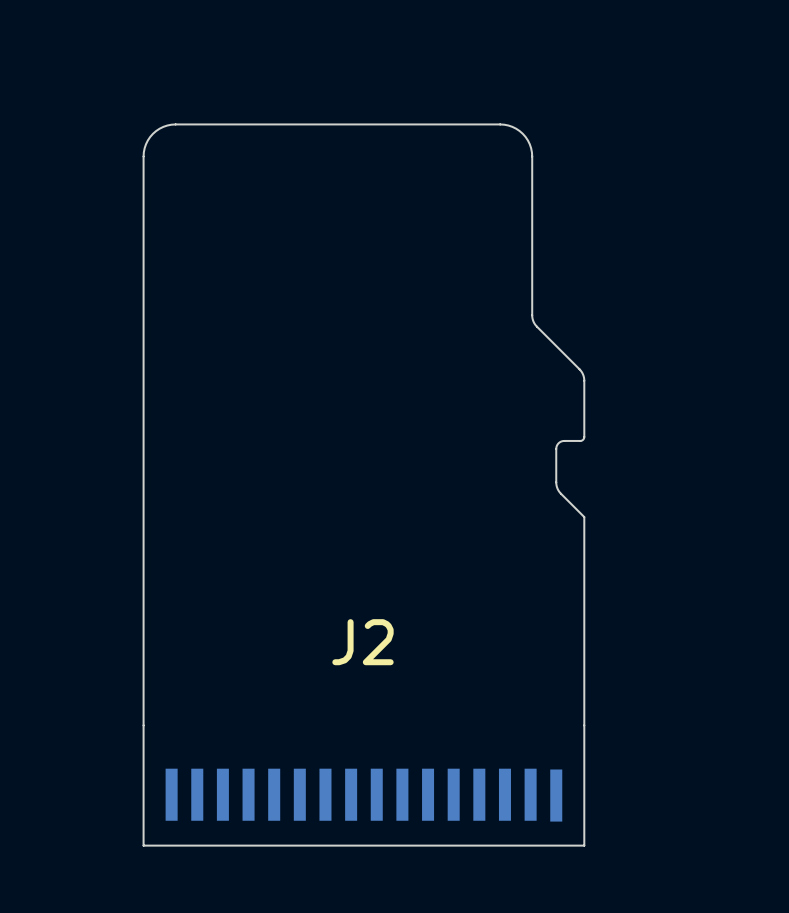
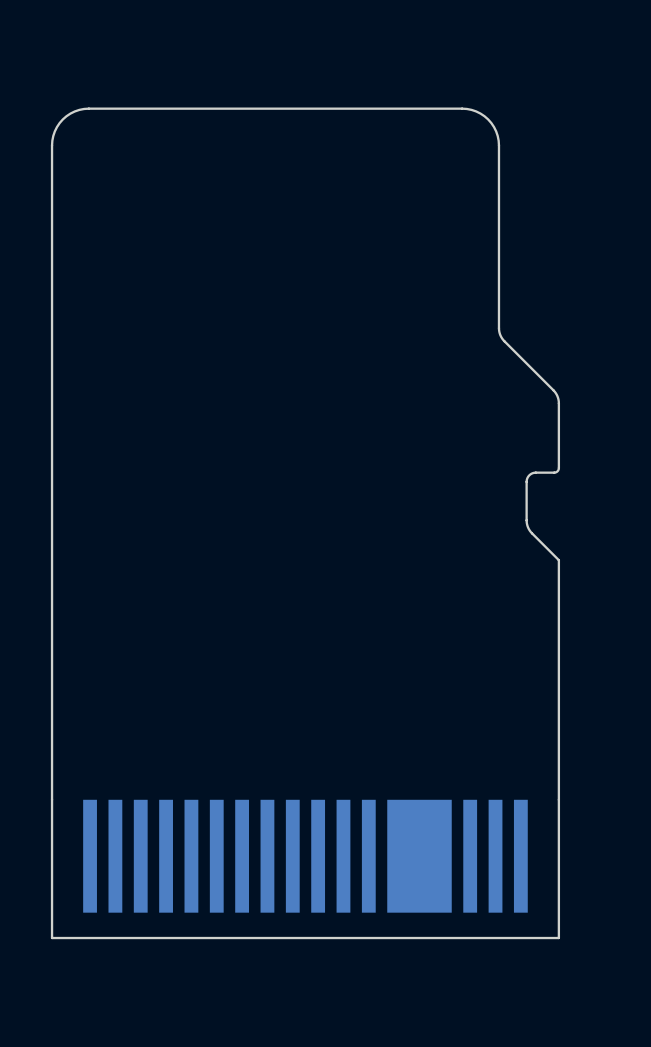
part: none -> (305, 856)
J2: (363, 795) -> none

